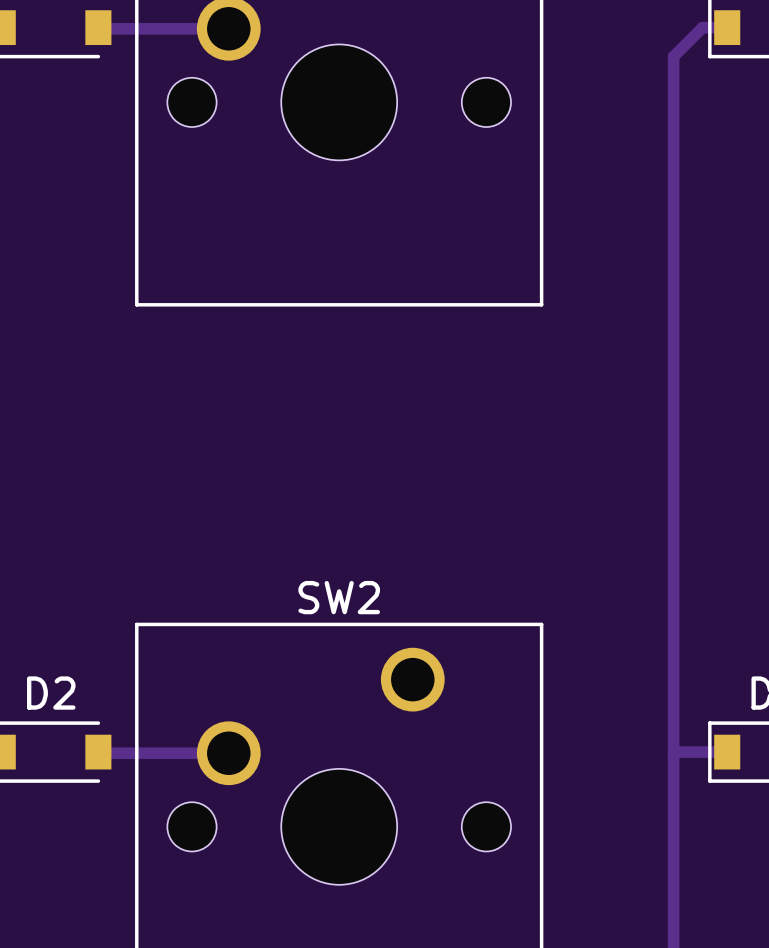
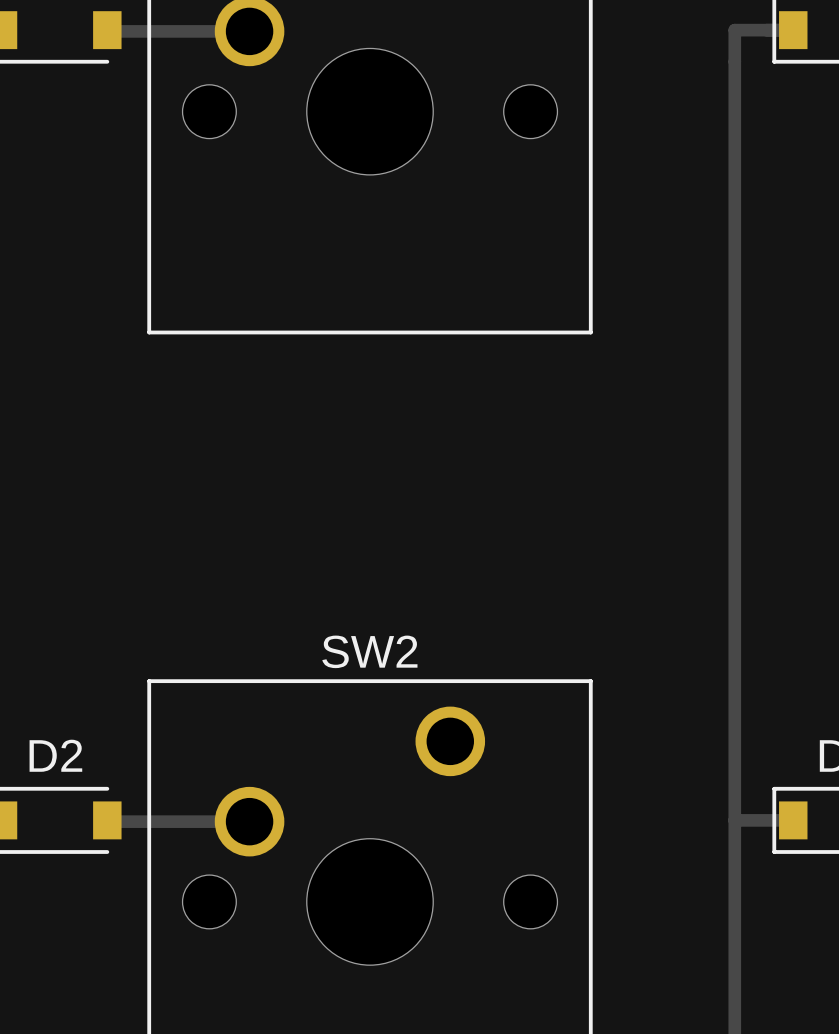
track: (702, 27) (673, 56) -> (766, 30) (734, 30) (734, 61)

